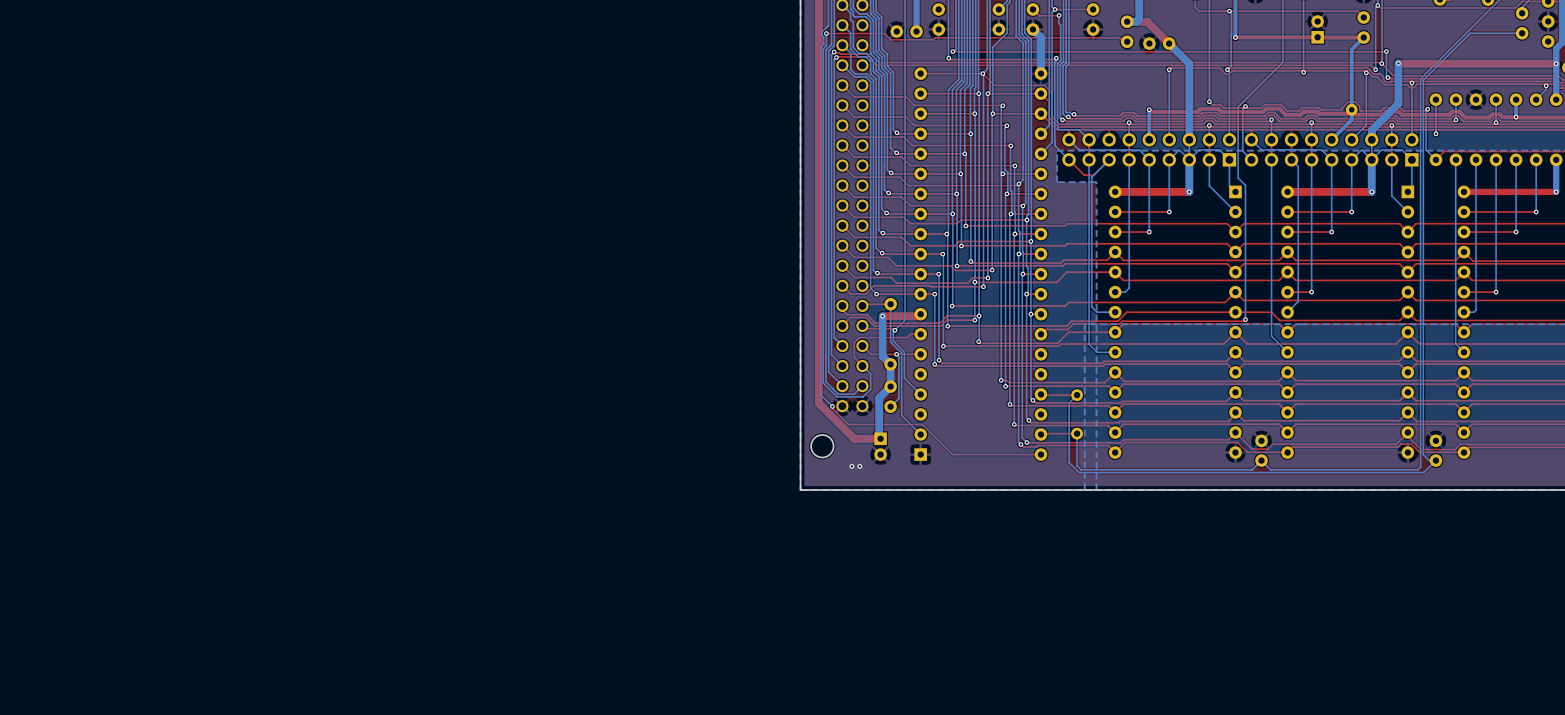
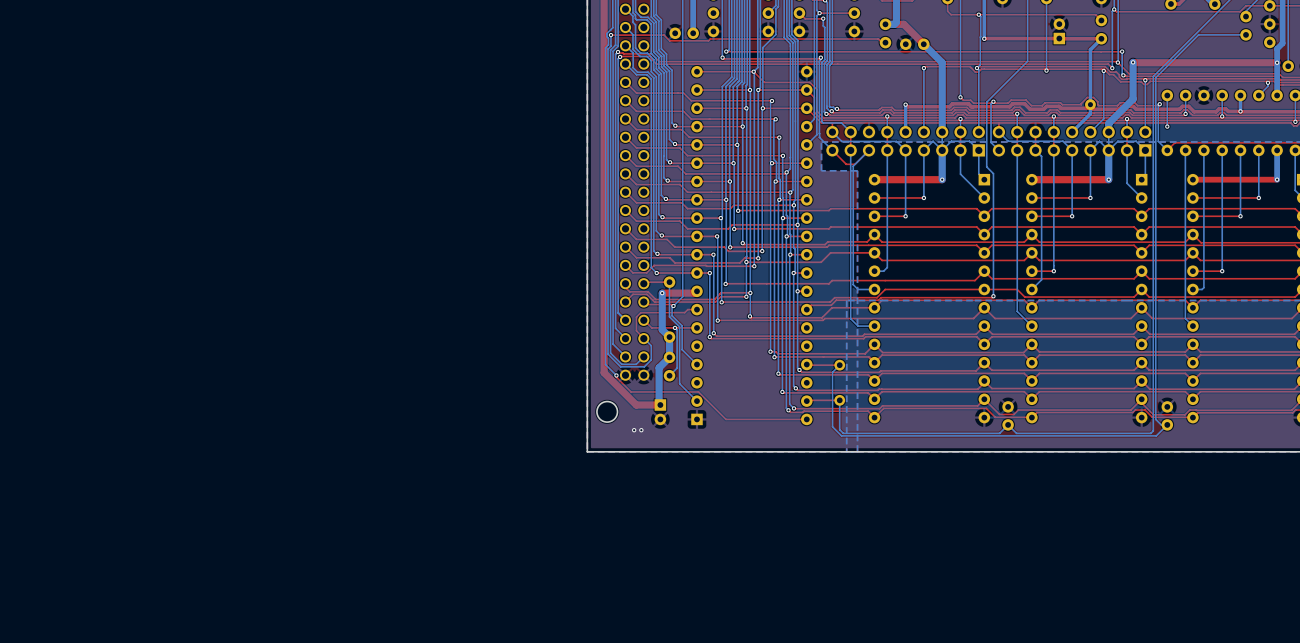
bottom track: (1032, 29) (1040, 37) (1040, 73) -> none

